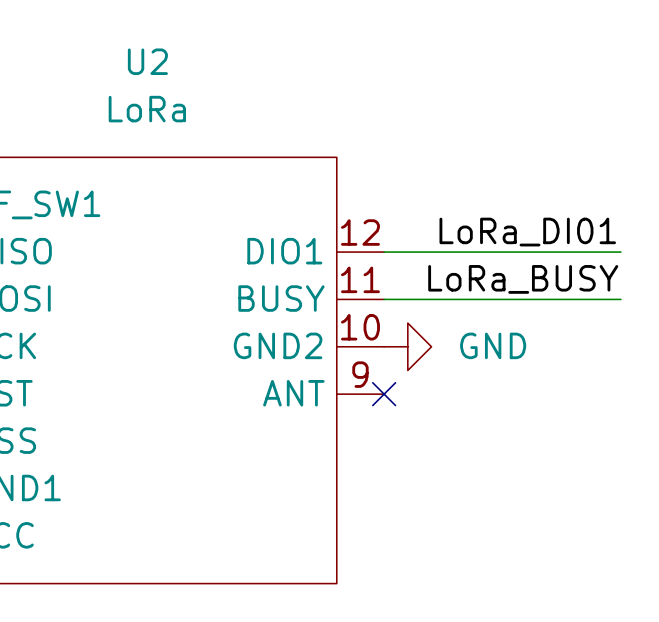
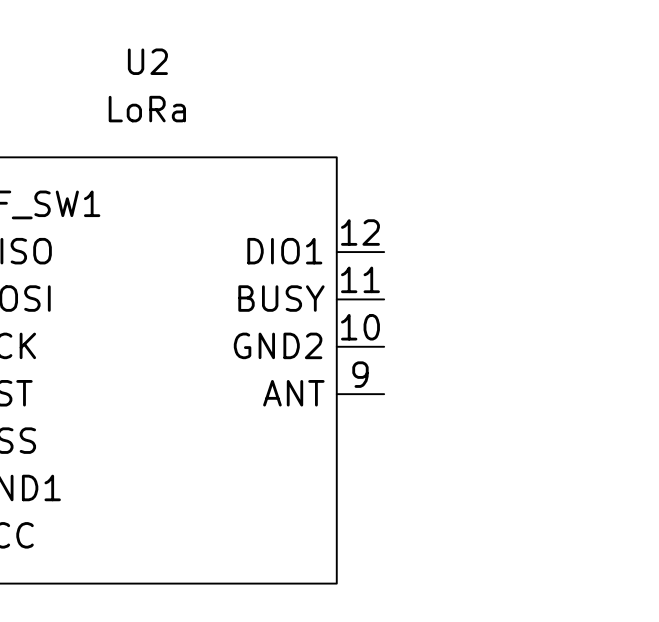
label: LoRa_DI01 (527, 232) -> none
wire: (384, 252) (620, 252) -> none
label: LoRa_BUSY (523, 279) -> none
wire: (384, 299) (620, 299) -> none
power symbol: GND (407, 346) -> none
no-connect mark: (384, 394) -> none

